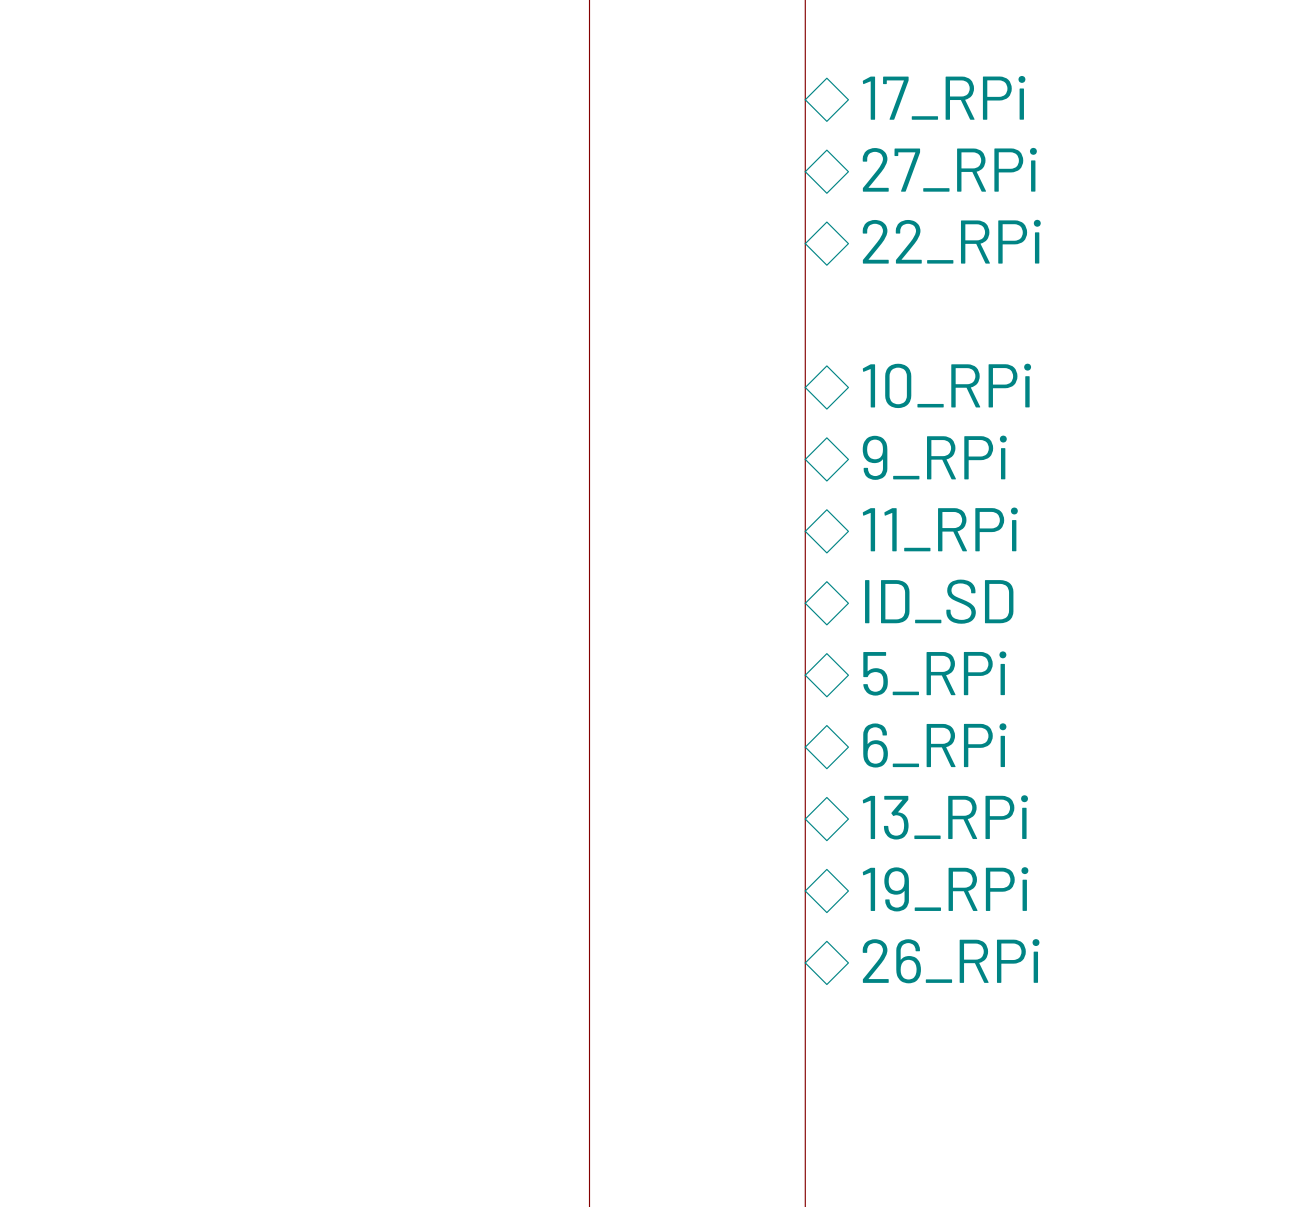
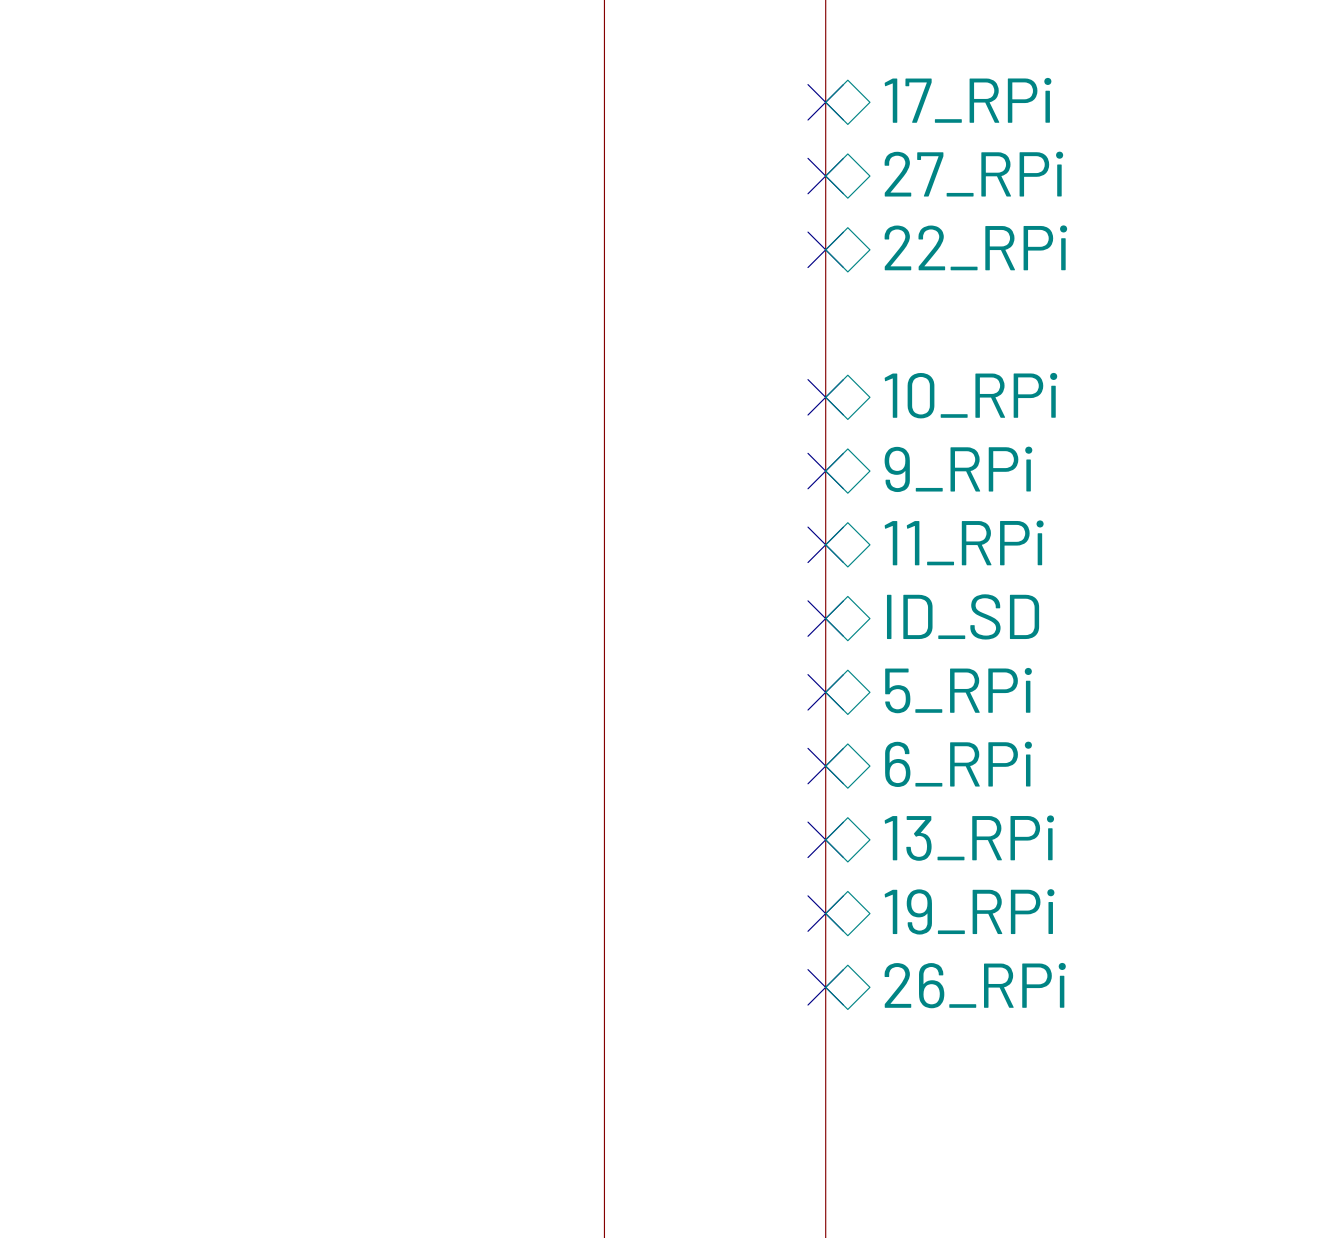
no-connect mark: none -> (825, 102)
no-connect mark: none -> (825, 176)
no-connect mark: none -> (825, 249)
no-connect mark: none -> (825, 397)
no-connect mark: none -> (825, 471)
no-connect mark: none -> (825, 544)
no-connect mark: none -> (825, 618)
no-connect mark: none -> (825, 692)
no-connect mark: none -> (825, 766)
no-connect mark: none -> (825, 839)
no-connect mark: none -> (825, 913)
no-connect mark: none -> (825, 987)

